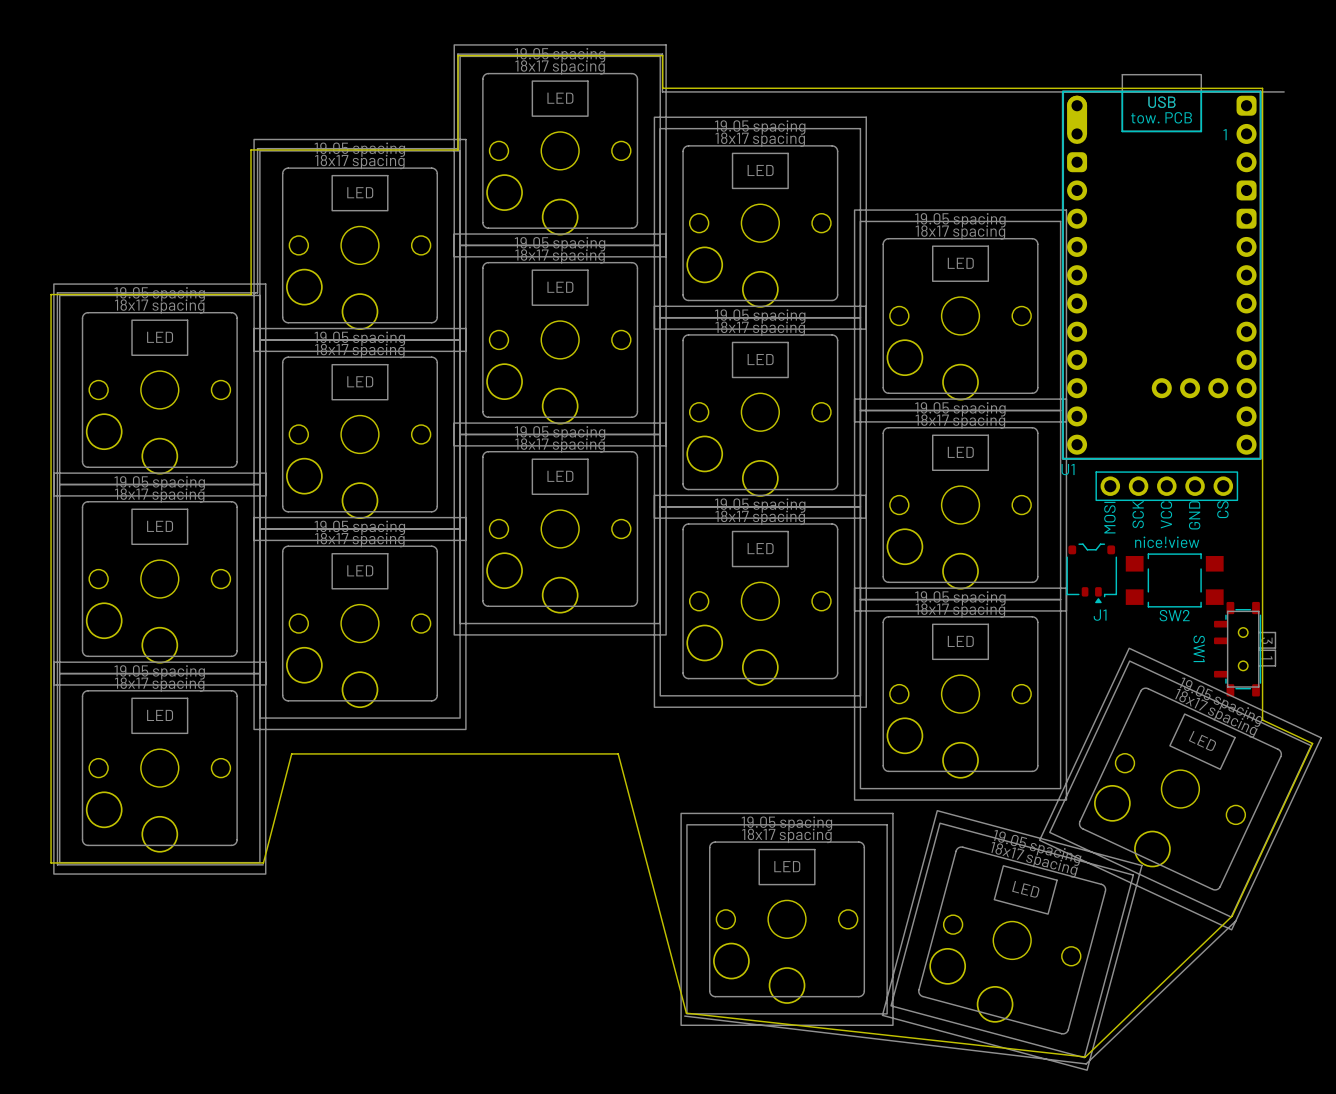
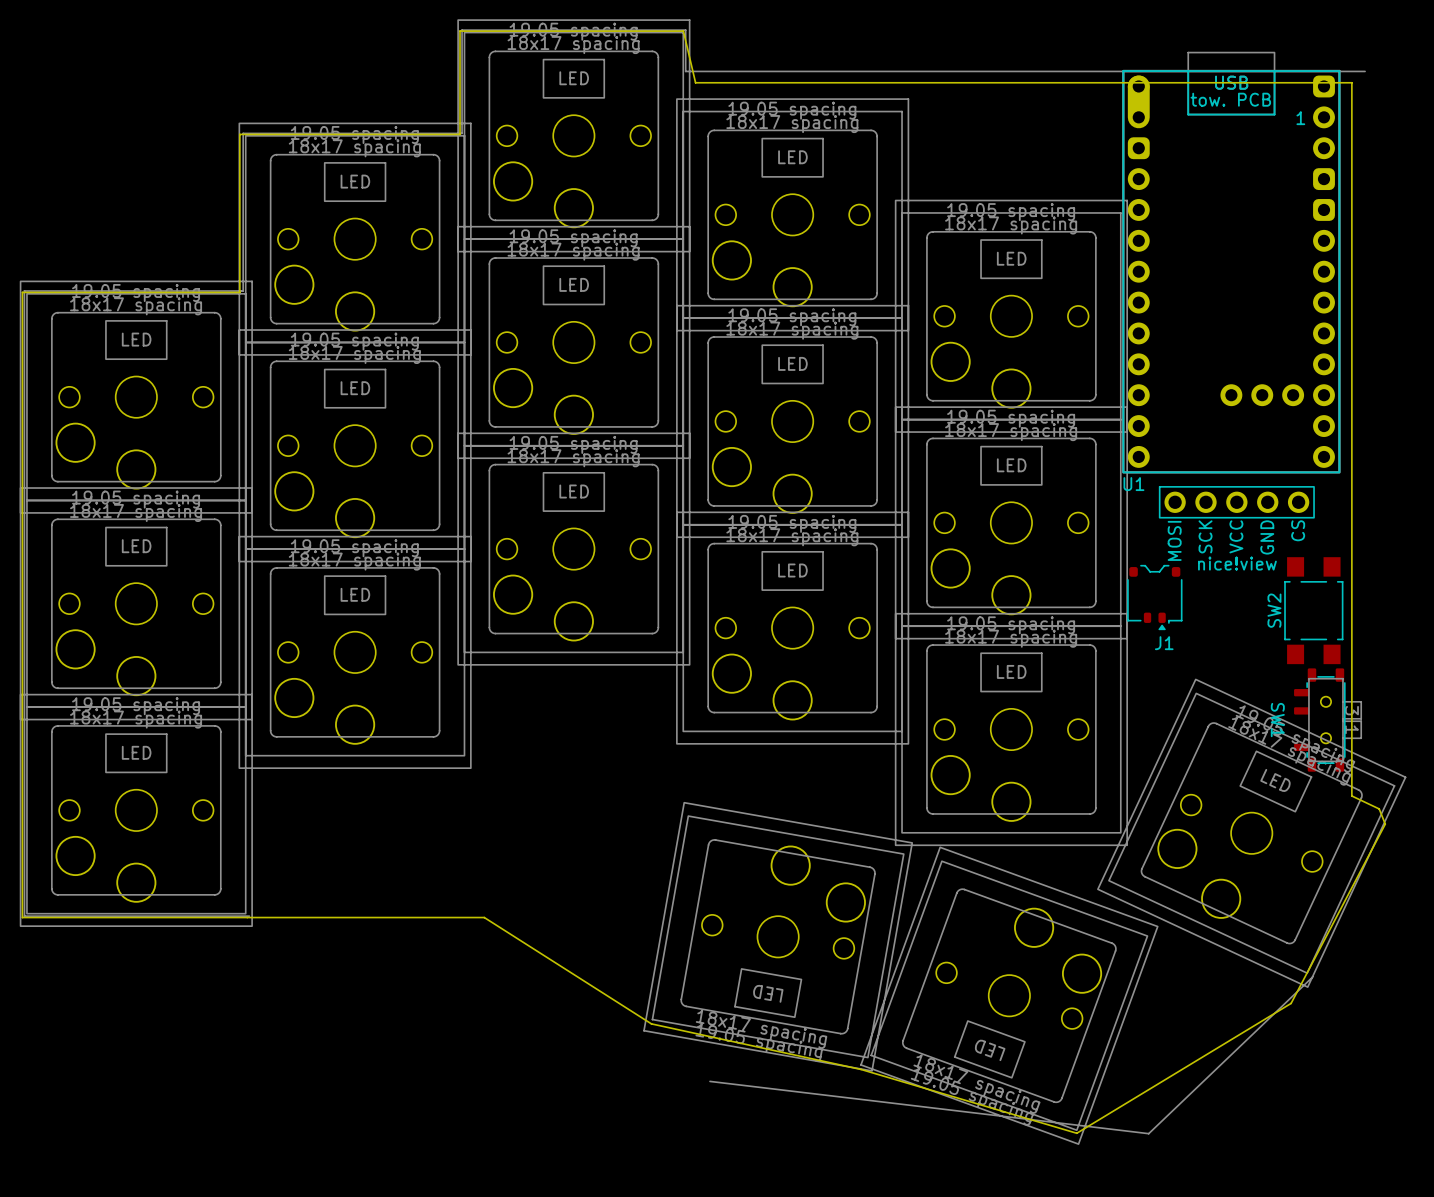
board edge: (458, 55) (458, 149) (251, 149) (251, 294) (51, 294) (51, 862) (263, 862) (291, 753) (618, 753) (686, 1013) (1085, 1057) (1232, 916) (1312, 743) (1262, 720) (1262, 88) (662, 88) (662, 55) (458, 55) -> (460, 31) (460, 134) (239, 134) (239, 292) (22, 292) (22, 917) (484, 917) (651, 1023) (861, 1069) (1076, 1133) (1291, 1003) (1385, 824) (1379, 808) (1351, 796) (1351, 82) (695, 82) (683, 31) (460, 31)
SW2 rotation: 0° (1174, 580) -> 90° clockwise (1313, 610)
SW2 position: (1174, 580) -> (1313, 610)
SW1 position: (1244, 649) -> (1327, 720)
part: none -> (778, 936)
part: (787, 919) -> none
part: none -> (1009, 995)
part: (1012, 940) -> none

